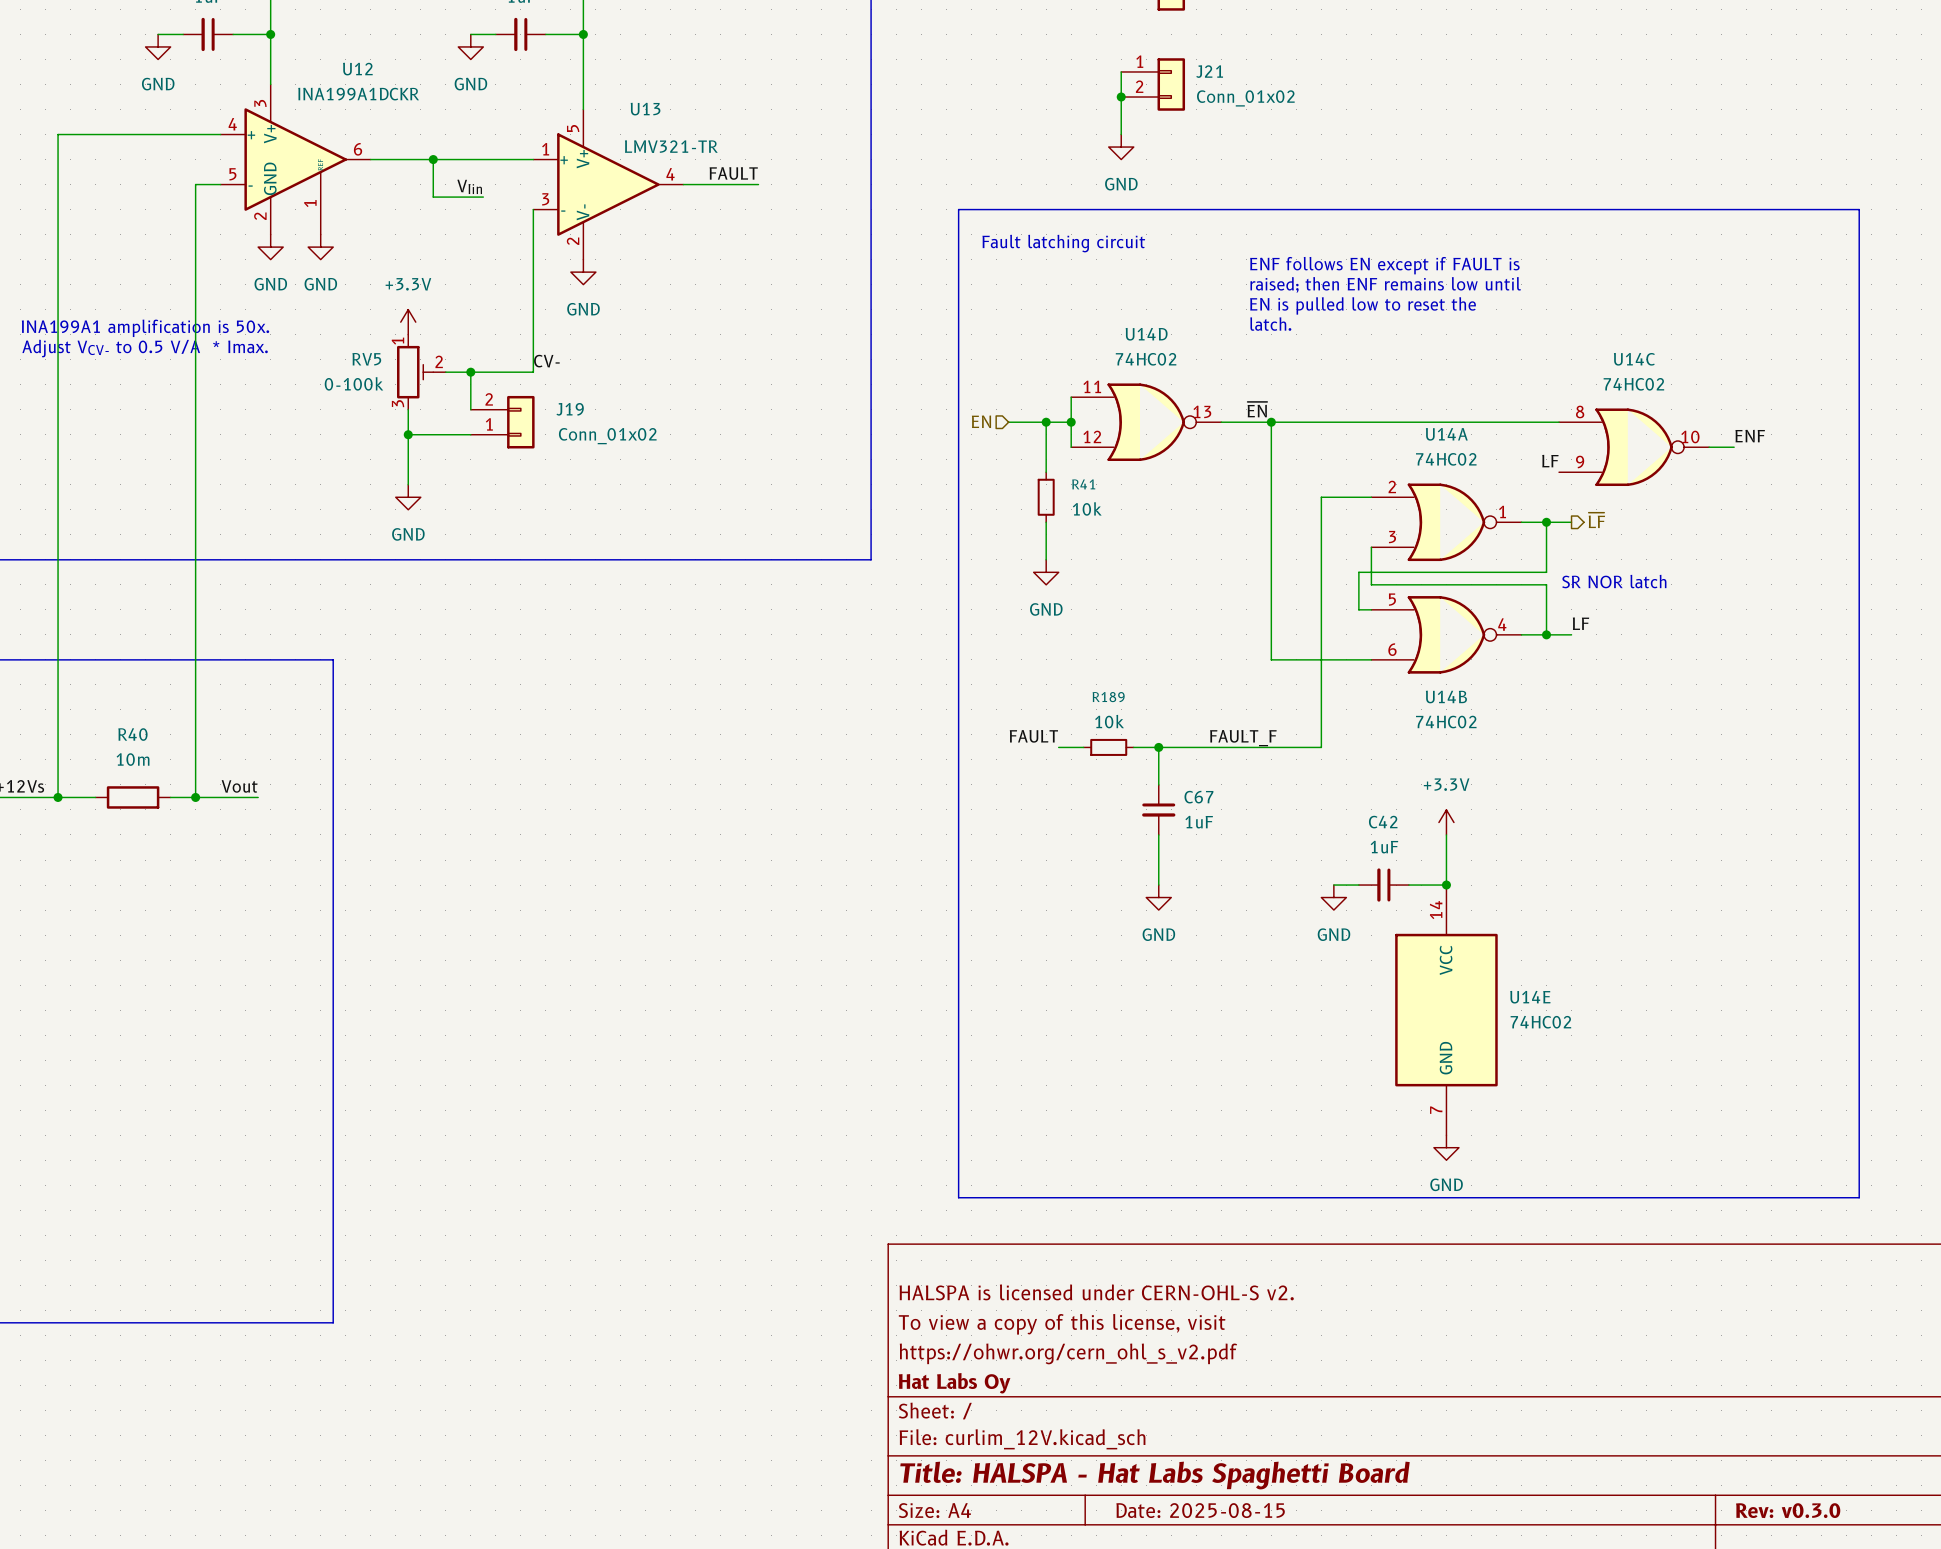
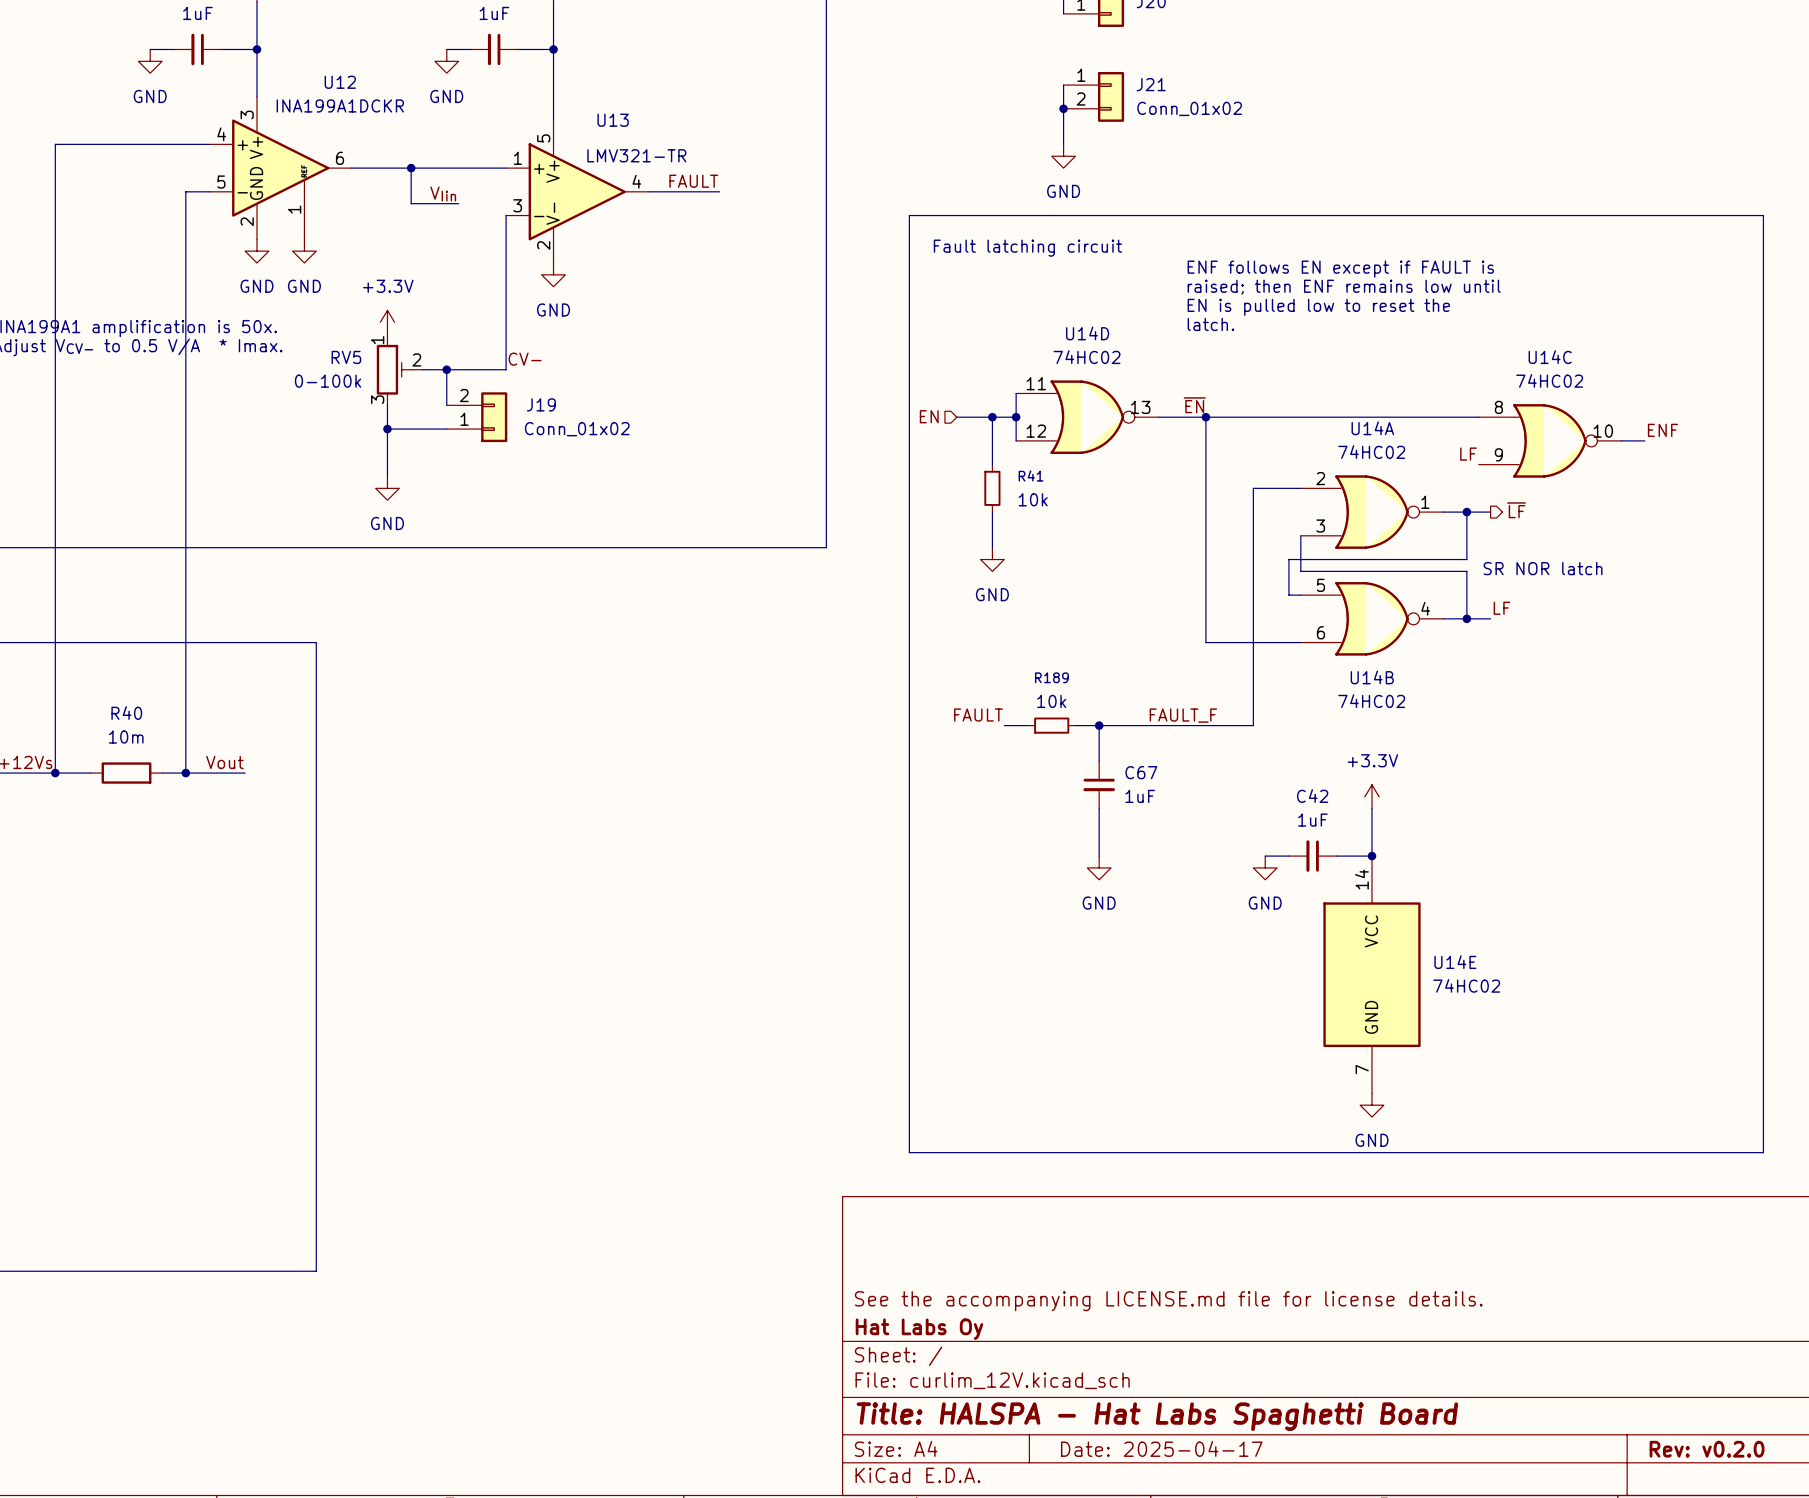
title block: HALSPA is licensed under CERN-OHL-S v2. (1096, 1292) -> none
title block: To view a copy of this license, visit (1062, 1324) -> none
title block: https://ohwr.org/cern_ohl_s_v2.pdf (1068, 1353) -> See the accompanying LICENSE.md file for license details. (1168, 1301)
title block: Date: 2025-08-15 (1200, 1510) -> Date: 2025-04-17 (1161, 1448)
title block: Rev: v0.3.0 (1788, 1510) -> Rev: v0.2.0 (1707, 1449)

